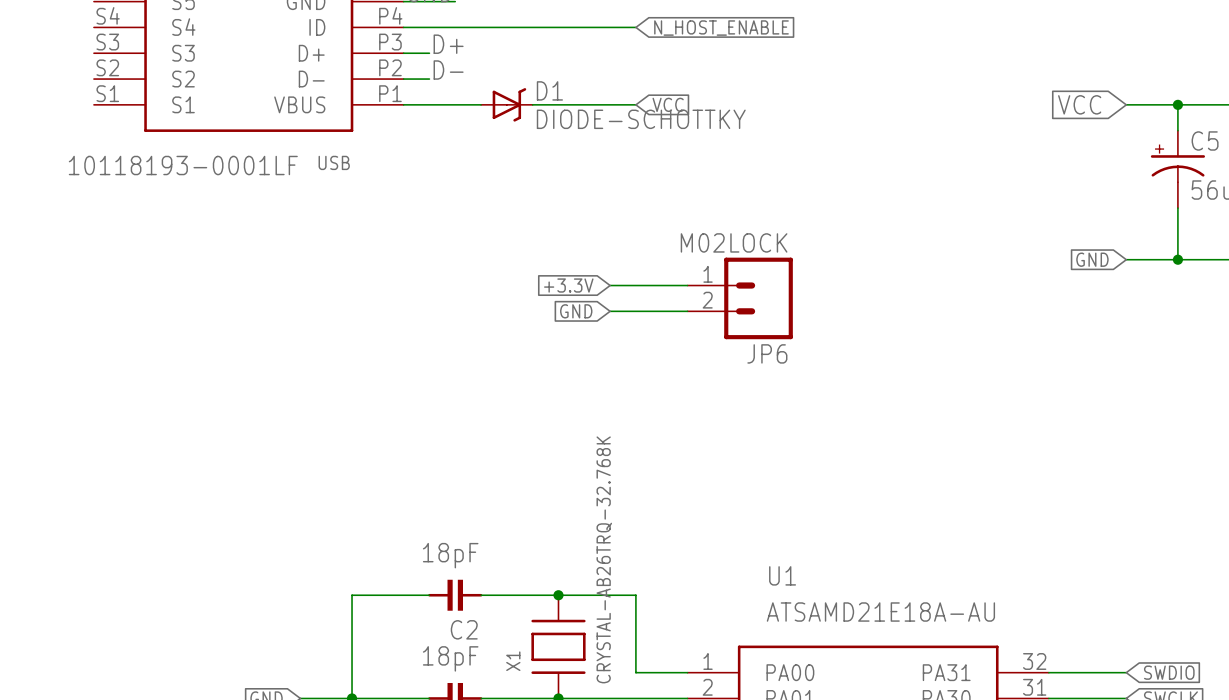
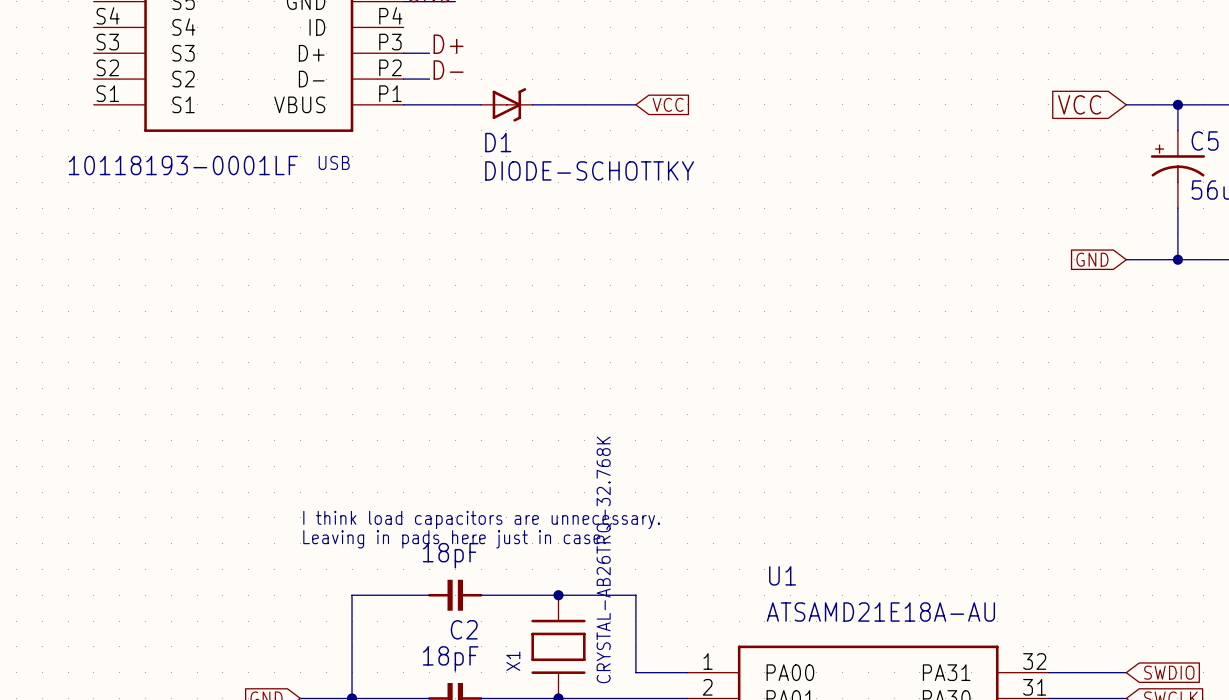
wire: (403, 27) (635, 27) -> none
global label: N_HOST_ENABLE (721, 28) -> none
D1 name position: D1 (549, 90) -> D1 (498, 142)
D1 value position: DIODE-SCHOTTKY (641, 119) -> DIODE-SCHOTTKY (589, 170)
global label: +3.3V (568, 285) -> none
wire: (610, 285) (687, 285) -> none
JP6: M02LOCK (740, 298) -> none
global label: GND (576, 311) -> none
wire: (610, 311) (687, 311) -> none
text: none -> I think load capacitors are unnecessary. (481, 519)
text: none -> Leaving in pads here just in case. (454, 539)

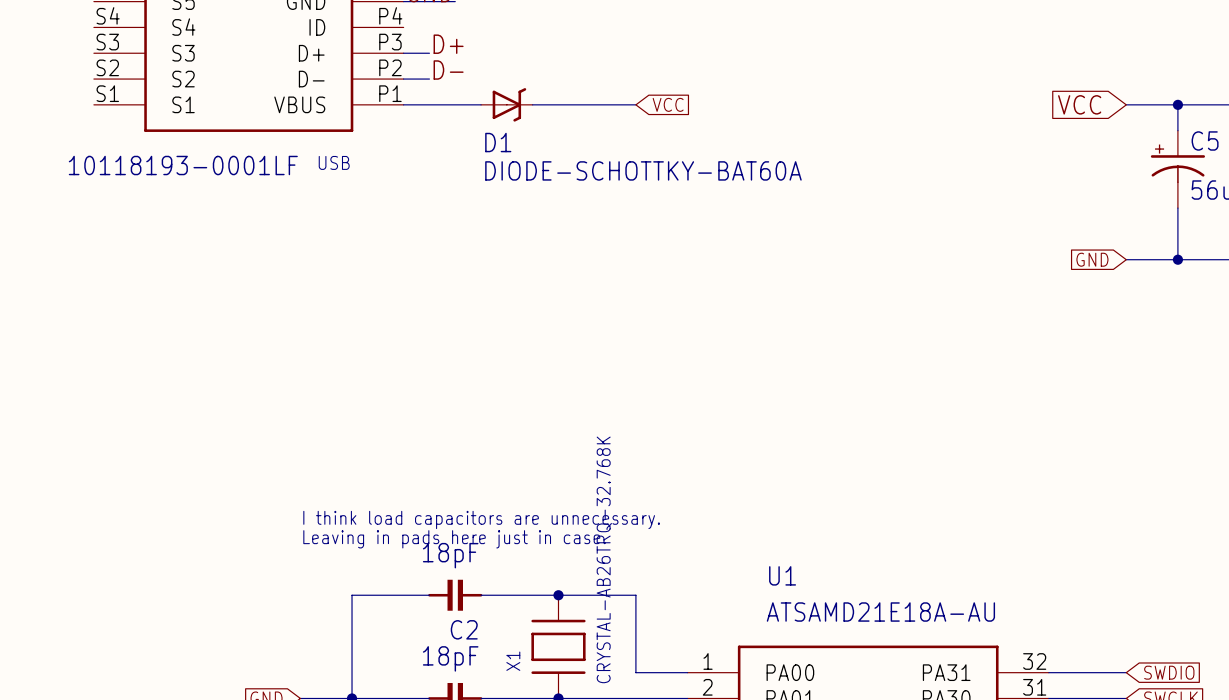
D1 value: DIODE-SCHOTTKY (589, 170) -> DIODE-SCHOTTKY-BAT60A (643, 170)

